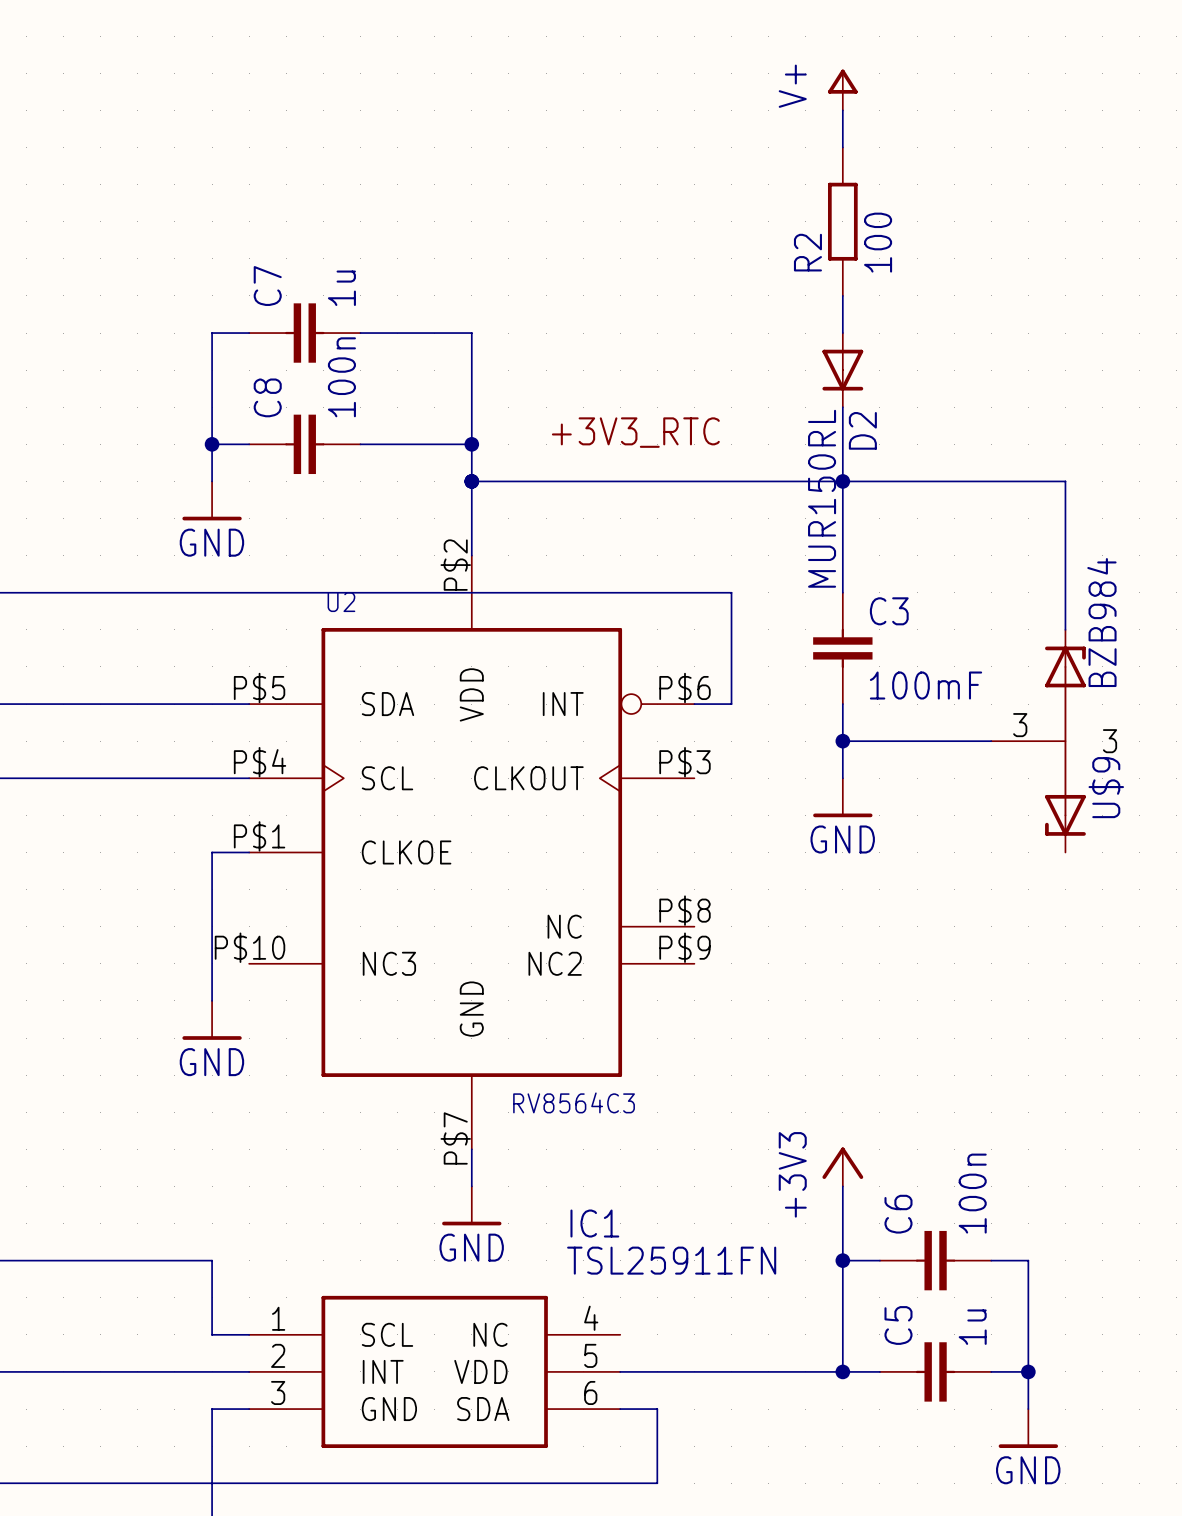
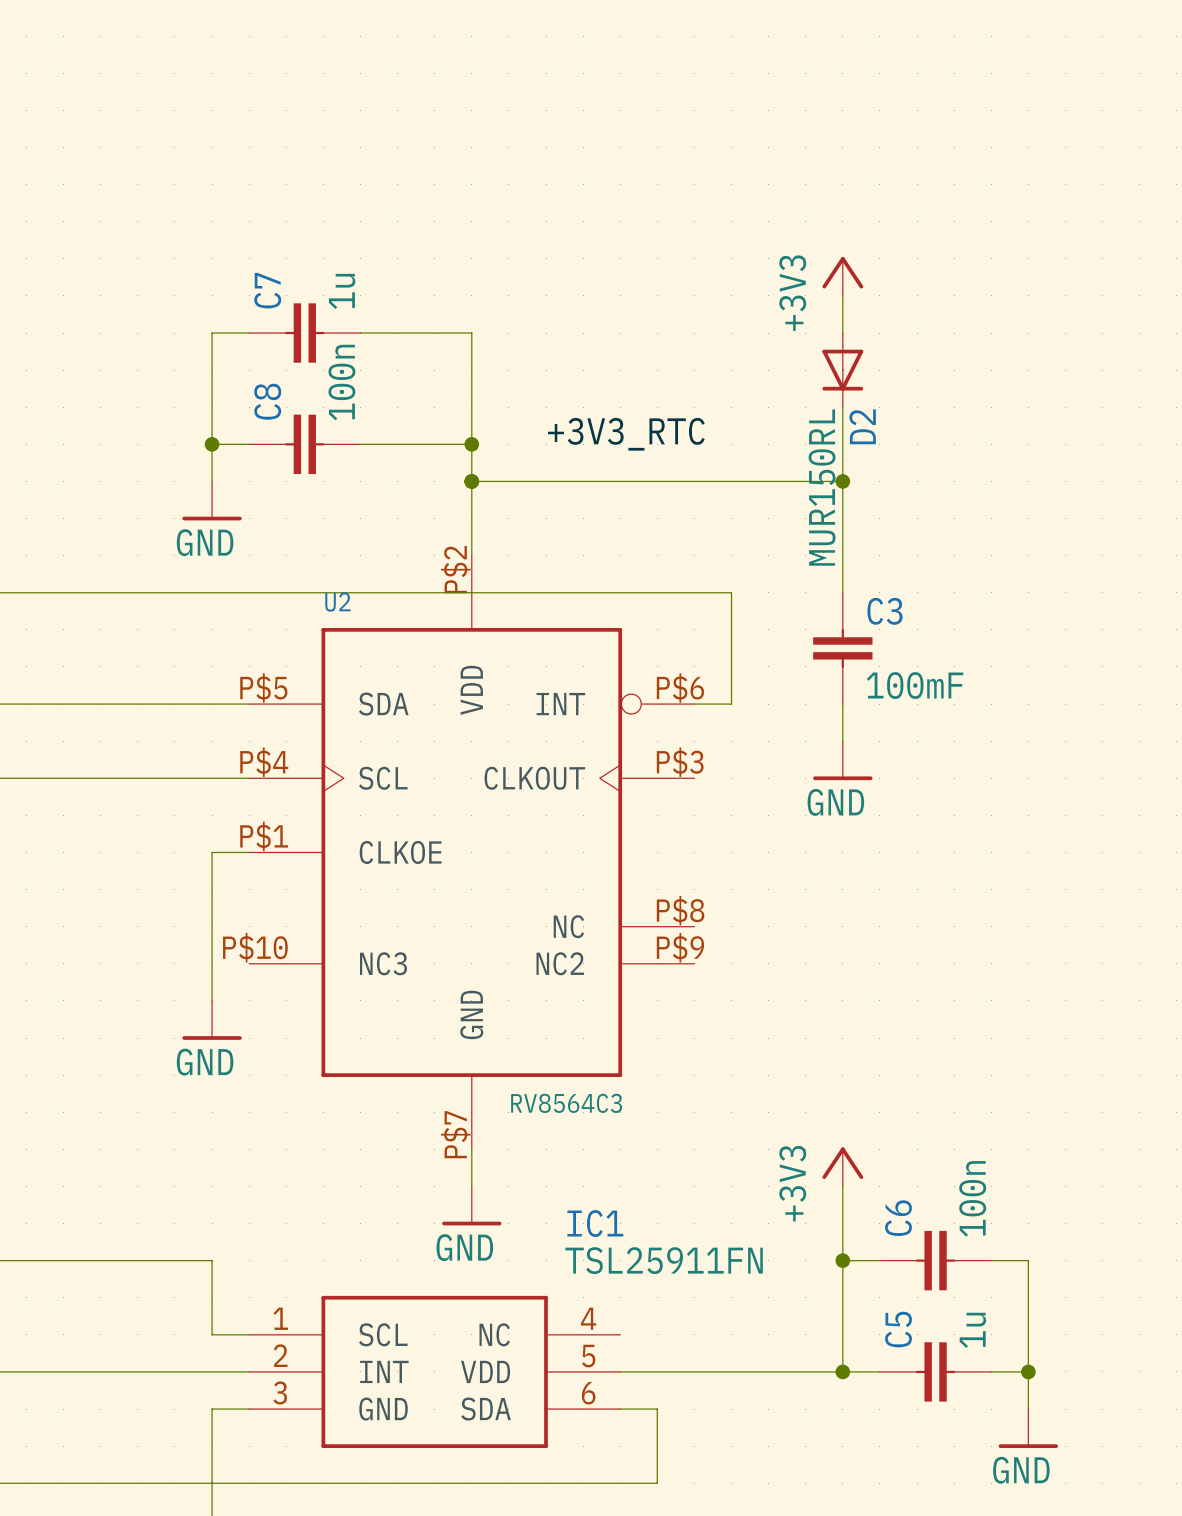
power symbol: V+ (842, 89) -> none
wire: (842, 110) (842, 147) -> none
R2: 100 (842, 221) -> none
power symbol: none -> +3V3 (842, 276)
wire: (842, 481) (1065, 481) (1065, 629) -> none
junction: (842, 741) -> none
wire: (991, 741) (842, 741) (842, 778) -> none
U$9: BZB984 (1038, 741) -> none
power symbol position: GND (842, 797) -> GND (842, 760)

